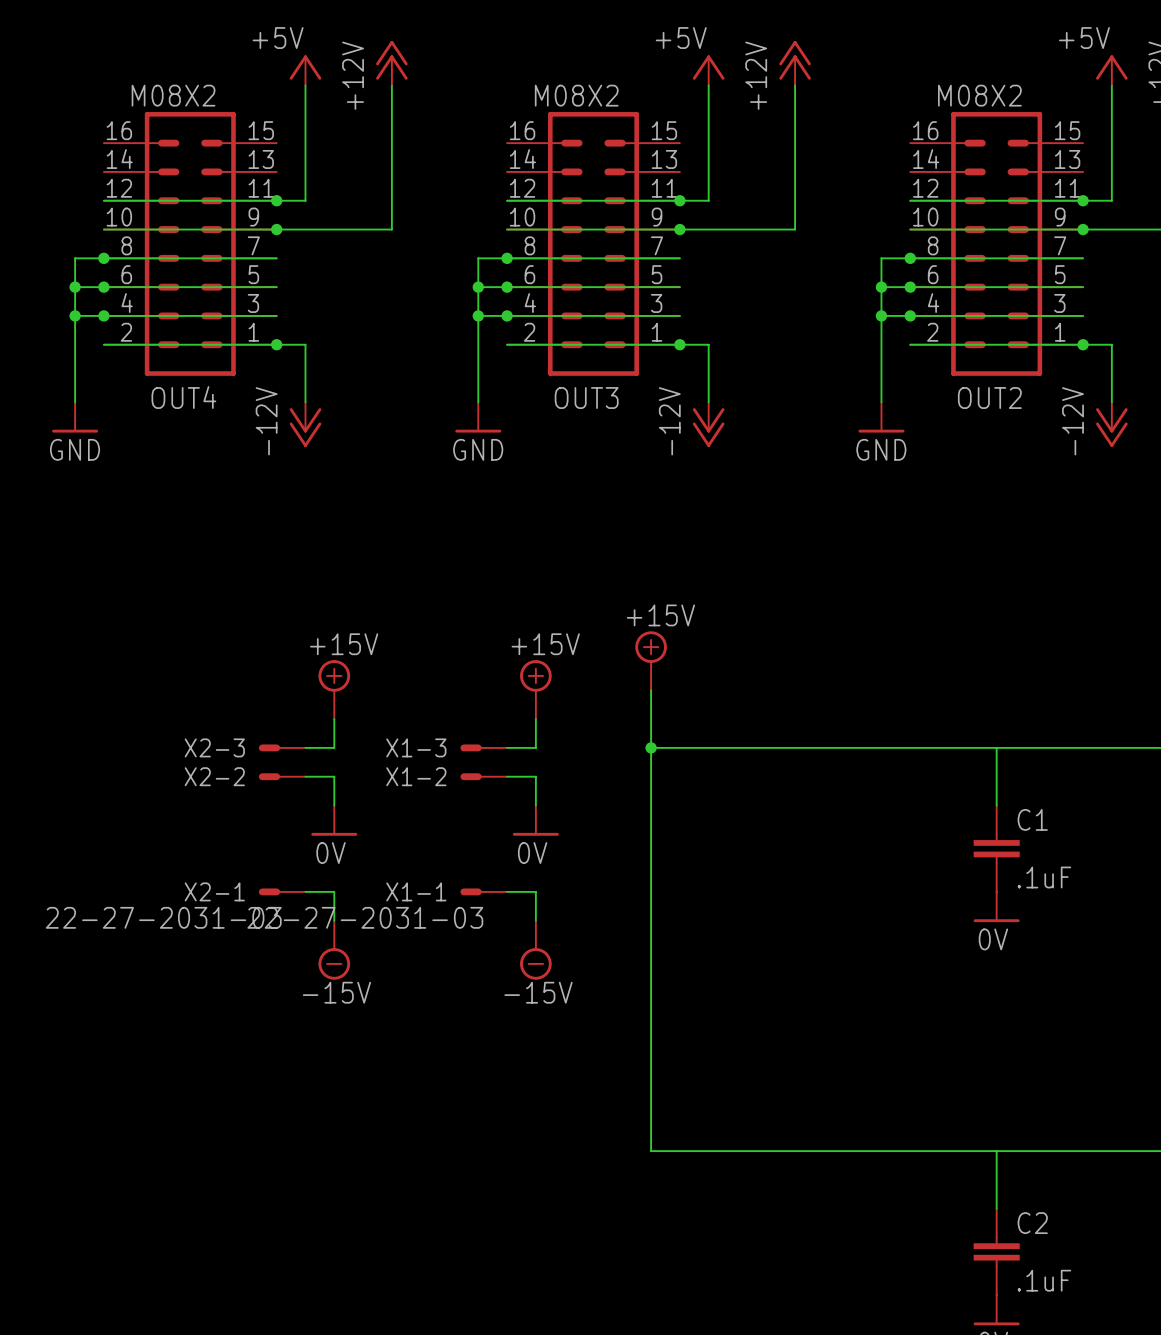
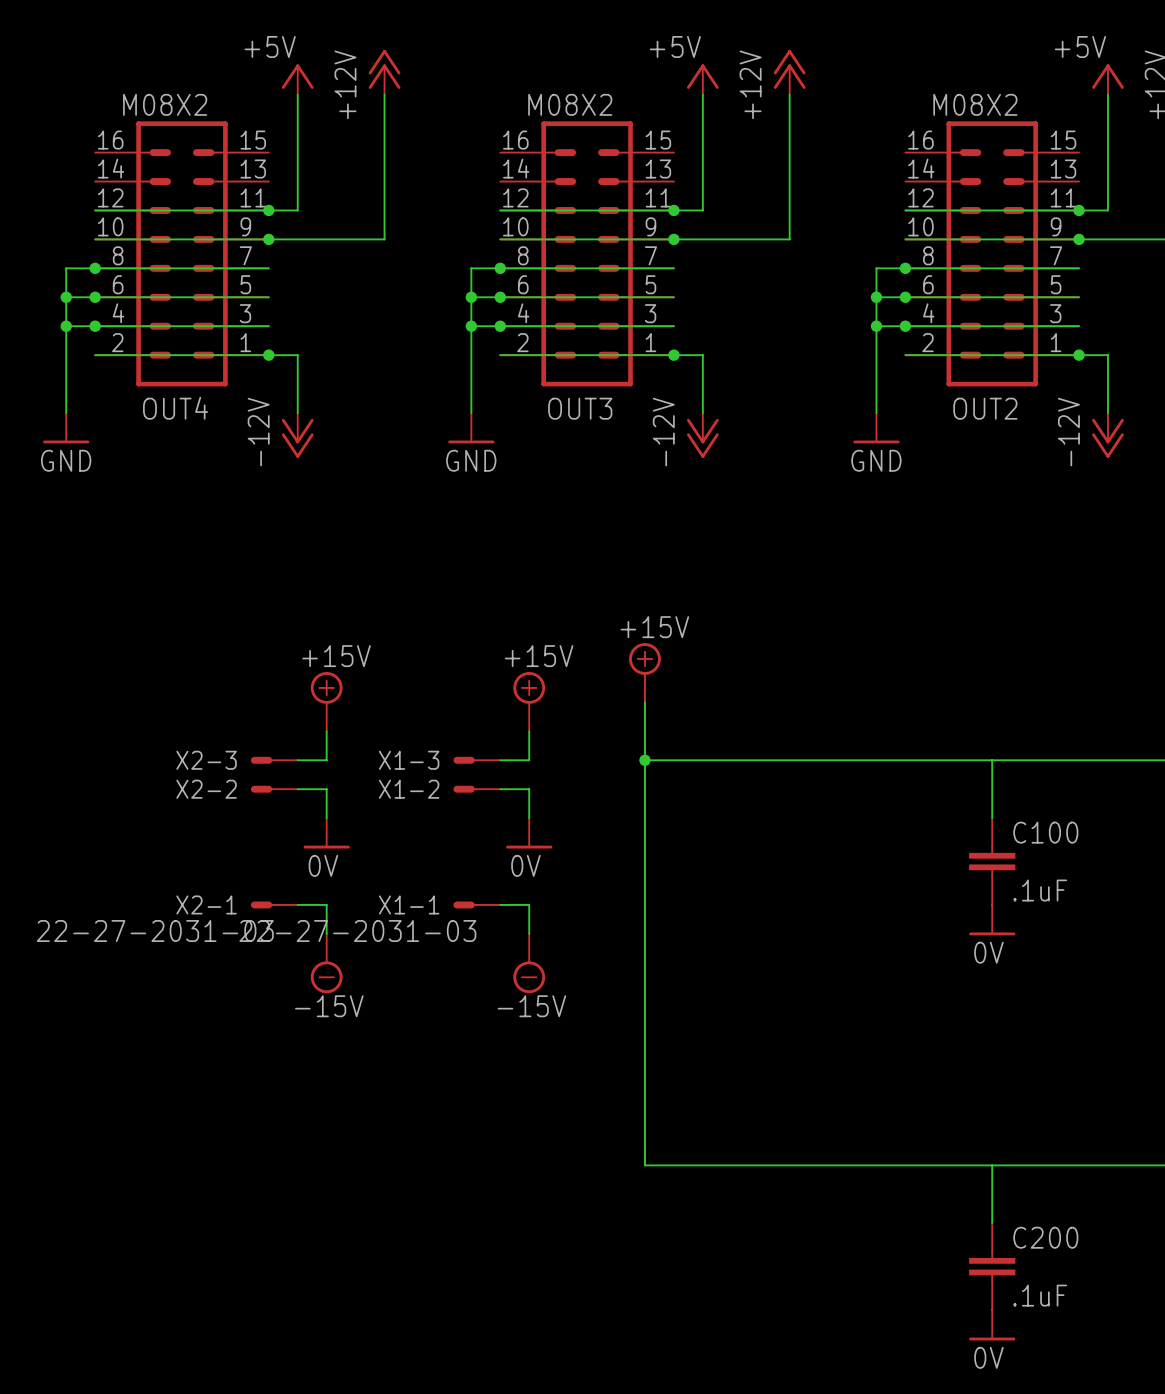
C1 name: C1 (1032, 819) -> C100 (1045, 832)
C2 name: C2 (1032, 1223) -> C200 (1045, 1237)

